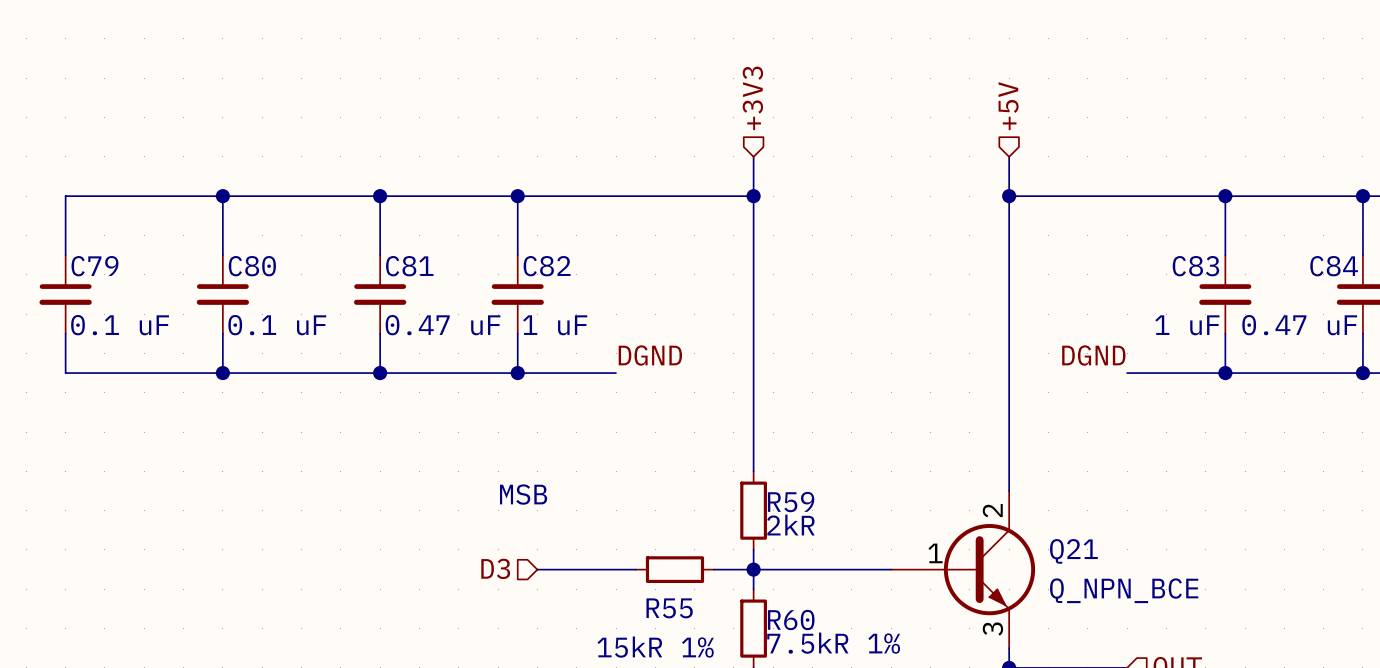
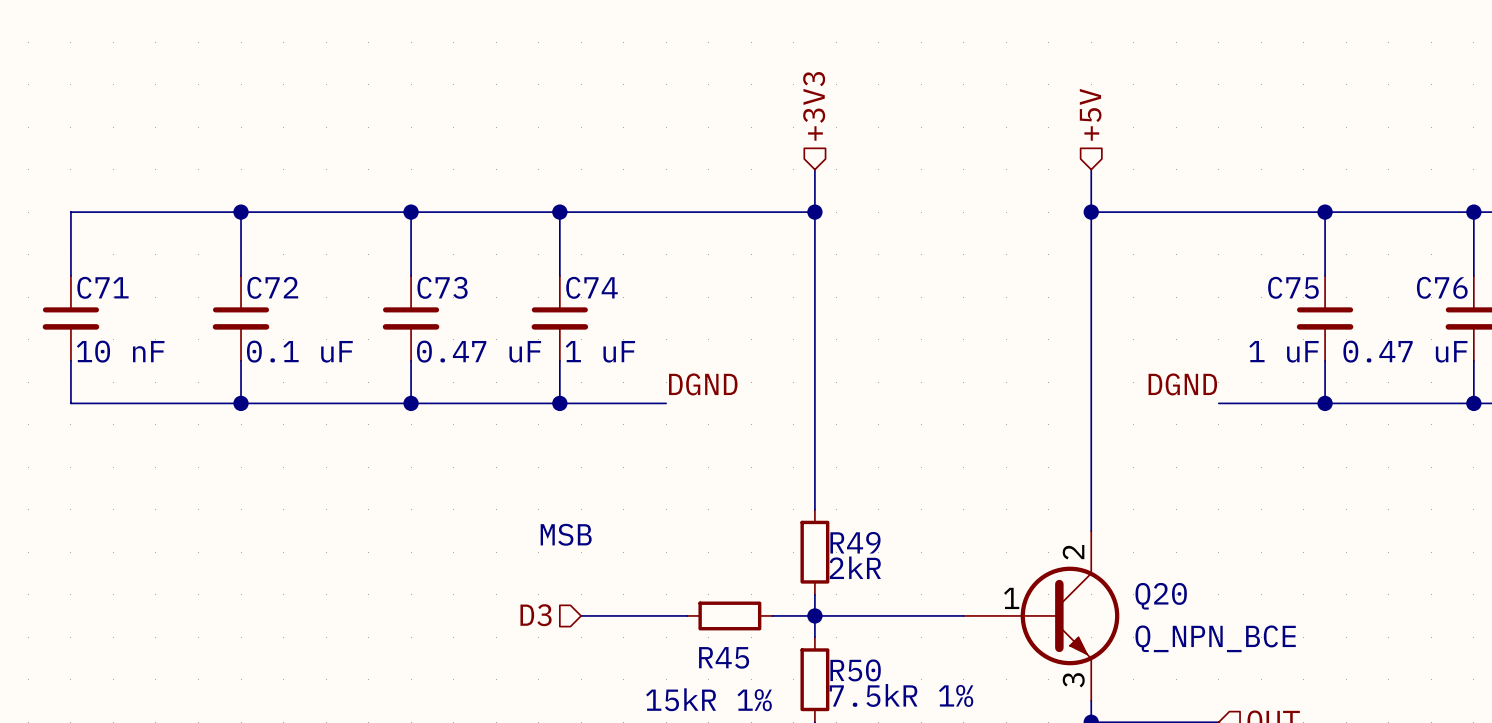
C79 name: C79 (94, 266) -> C71 (102, 287)
C80 name: C80 (252, 266) -> C72 (272, 287)
C81 name: C81 (409, 266) -> C73 (442, 287)
C82 name: C82 (547, 266) -> C74 (592, 287)
C83 name: C83 (1195, 266) -> C75 (1293, 287)
C84 name: C84 (1334, 266) -> C76 (1442, 287)
C79 value: 0.1 uF (120, 325) -> 10 nF (120, 351)
R59 name: R59 (791, 502) -> R49 (855, 542)
Q21 name: Q21 (1073, 551) -> Q20 (1161, 596)
R55 name: R55 (669, 608) -> R45 (724, 657)
R60 name: R60 (791, 619) -> R50 (855, 670)

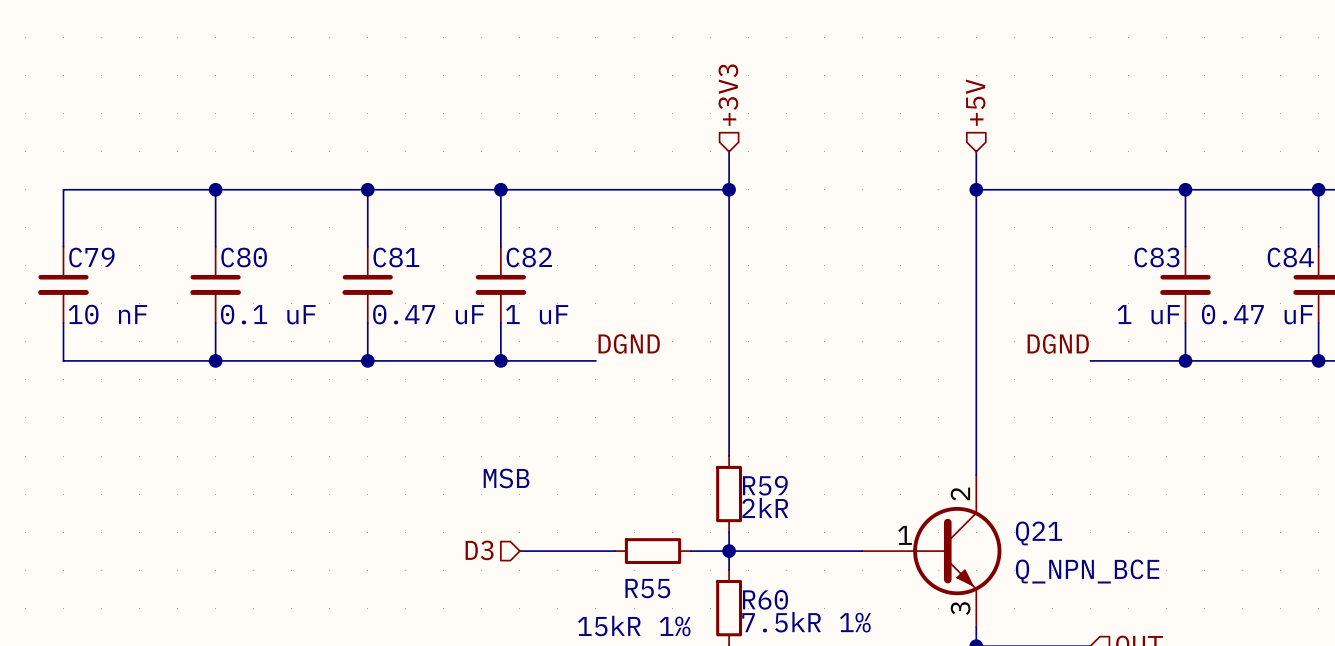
C71 name: C71 (102, 287) -> C79 (91, 257)
C72 name: C72 (272, 287) -> C80 (244, 257)
C73 name: C73 (442, 287) -> C81 (396, 257)
C74 name: C74 (592, 287) -> C82 (529, 257)
C75 name: C75 (1293, 287) -> C83 (1157, 257)
C76 name: C76 (1442, 287) -> C84 (1290, 257)
R49 name: R49 (855, 542) -> R59 (765, 485)
Q20 name: Q20 (1161, 596) -> Q21 (1038, 533)
R45 name: R45 (724, 657) -> R55 (647, 588)
R50 name: R50 (855, 670) -> R60 (765, 599)

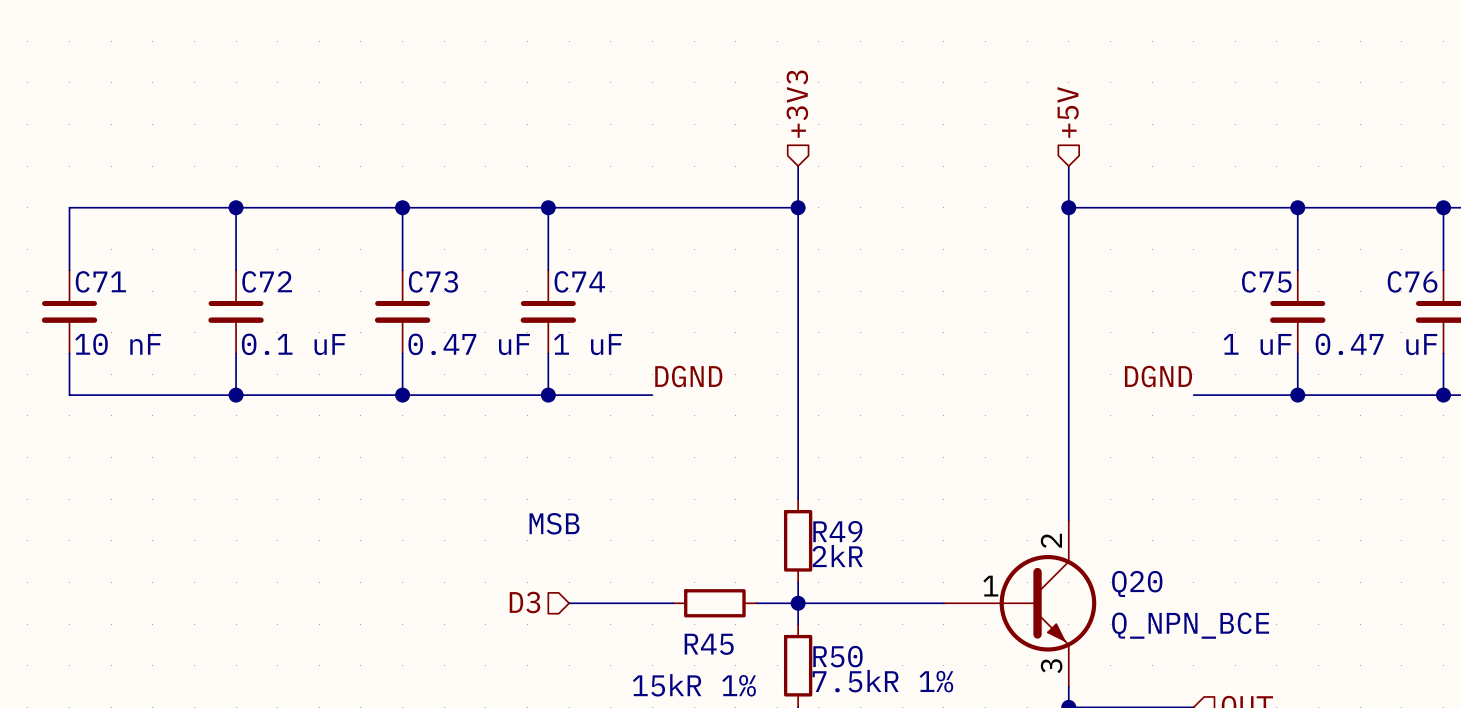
C79 name: C79 (91, 257) -> C71 (100, 281)
C80 name: C80 (244, 257) -> C72 (267, 281)
C81 name: C81 (396, 257) -> C73 (433, 281)
C82 name: C82 (529, 257) -> C74 (579, 281)
C83 name: C83 (1157, 257) -> C75 (1266, 281)
C84 name: C84 (1290, 257) -> C76 (1412, 281)
R59 name: R59 (765, 485) -> R49 (837, 531)
Q21 name: Q21 (1038, 533) -> Q20 (1137, 583)
R55 name: R55 (647, 588) -> R45 (709, 644)
R60 name: R60 (765, 599) -> R50 (837, 656)

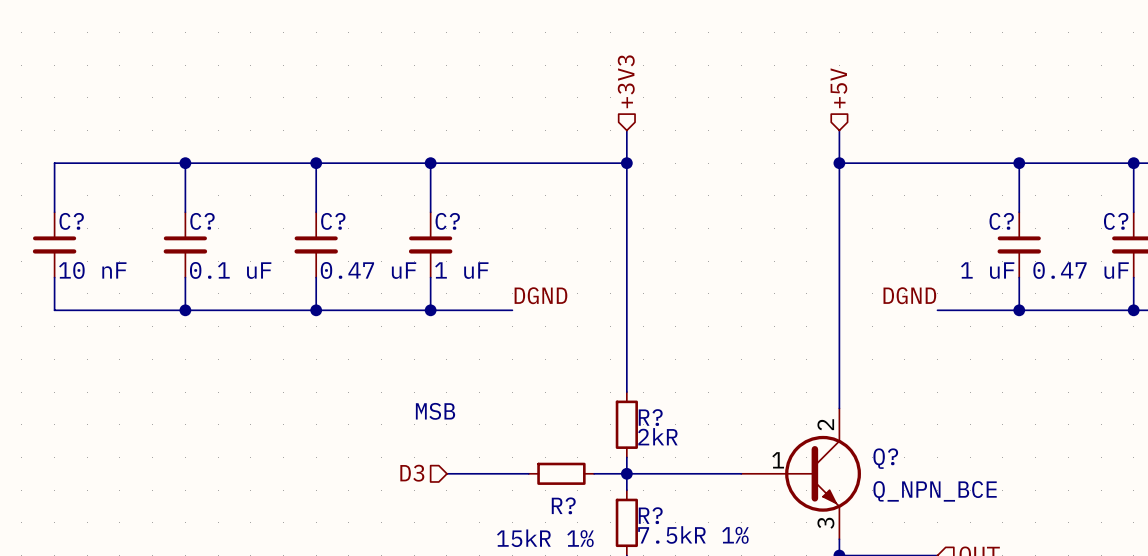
C71 name: C71 (100, 281) -> C? (71, 221)
C72 name: C72 (267, 281) -> C? (202, 221)
C73 name: C73 (433, 281) -> C? (333, 221)
C74 name: C74 (579, 281) -> C? (447, 221)
C75 name: C75 (1266, 281) -> C? (1001, 221)
C76 name: C76 (1412, 281) -> C? (1116, 221)
R49 name: R49 (837, 531) -> R? (650, 417)
Q20 name: Q20 (1137, 583) -> Q? (885, 458)
R45 name: R45 (709, 644) -> R? (563, 505)
R50 name: R50 (837, 656) -> R? (650, 515)

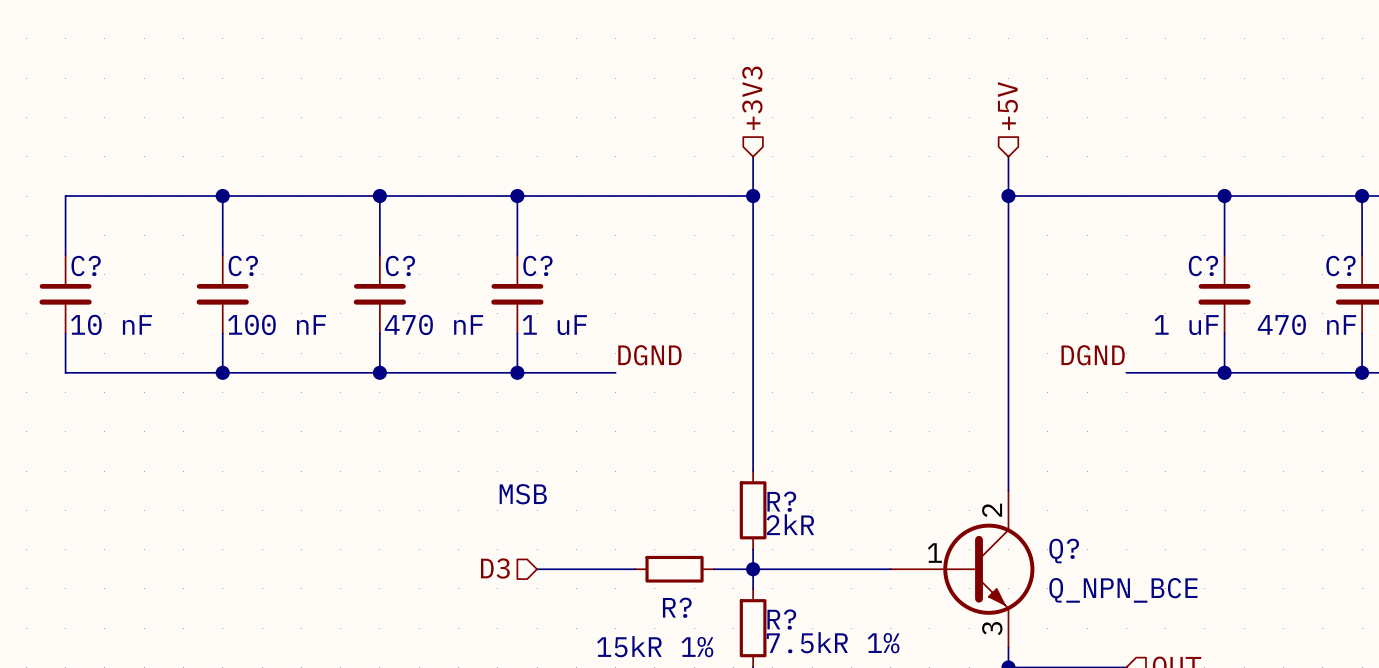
C? value: 0.1 uF (230, 270) -> 100 nF (277, 324)
C? value: 0.47 uF (368, 270) -> 470 nF (433, 324)
C? value: 0.47 uF (1081, 270) -> 470 nF (1306, 324)

